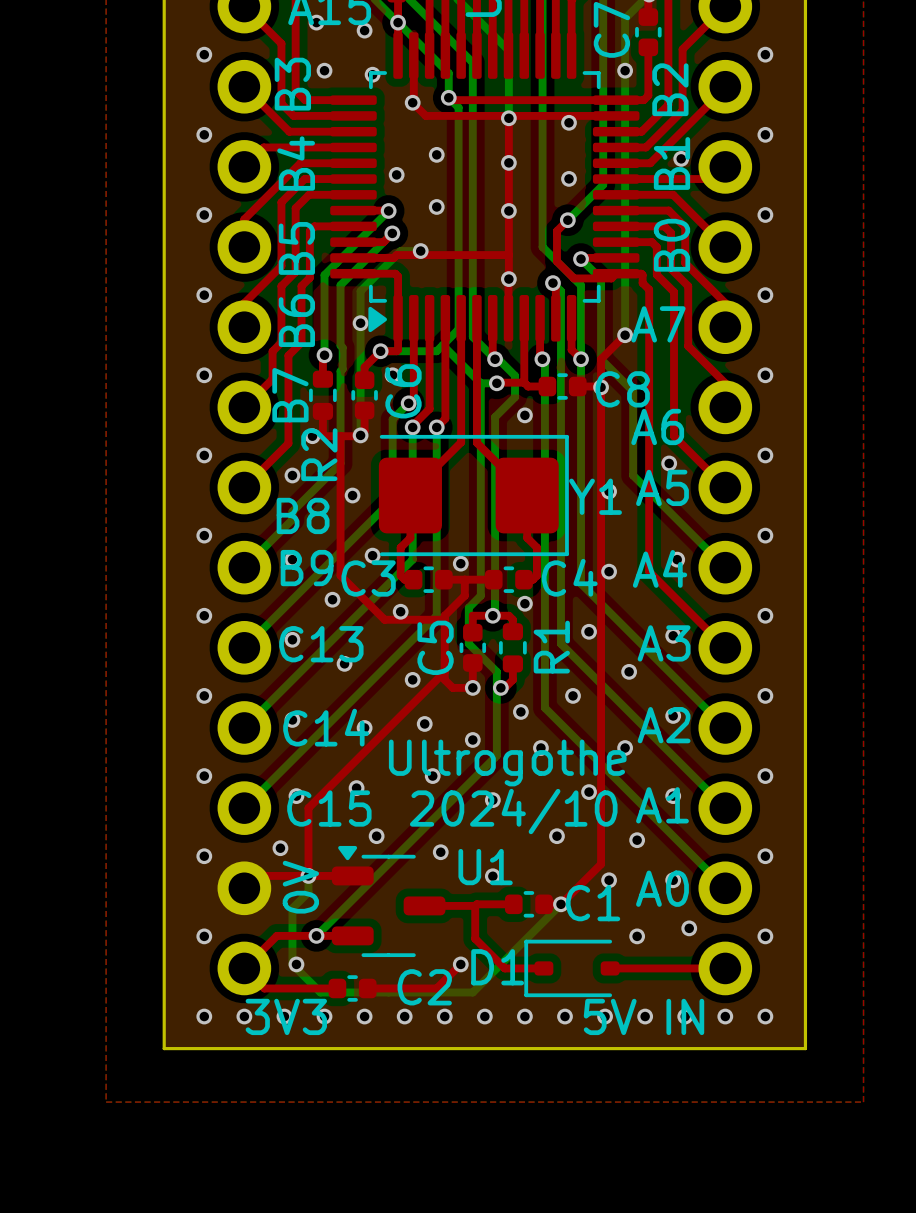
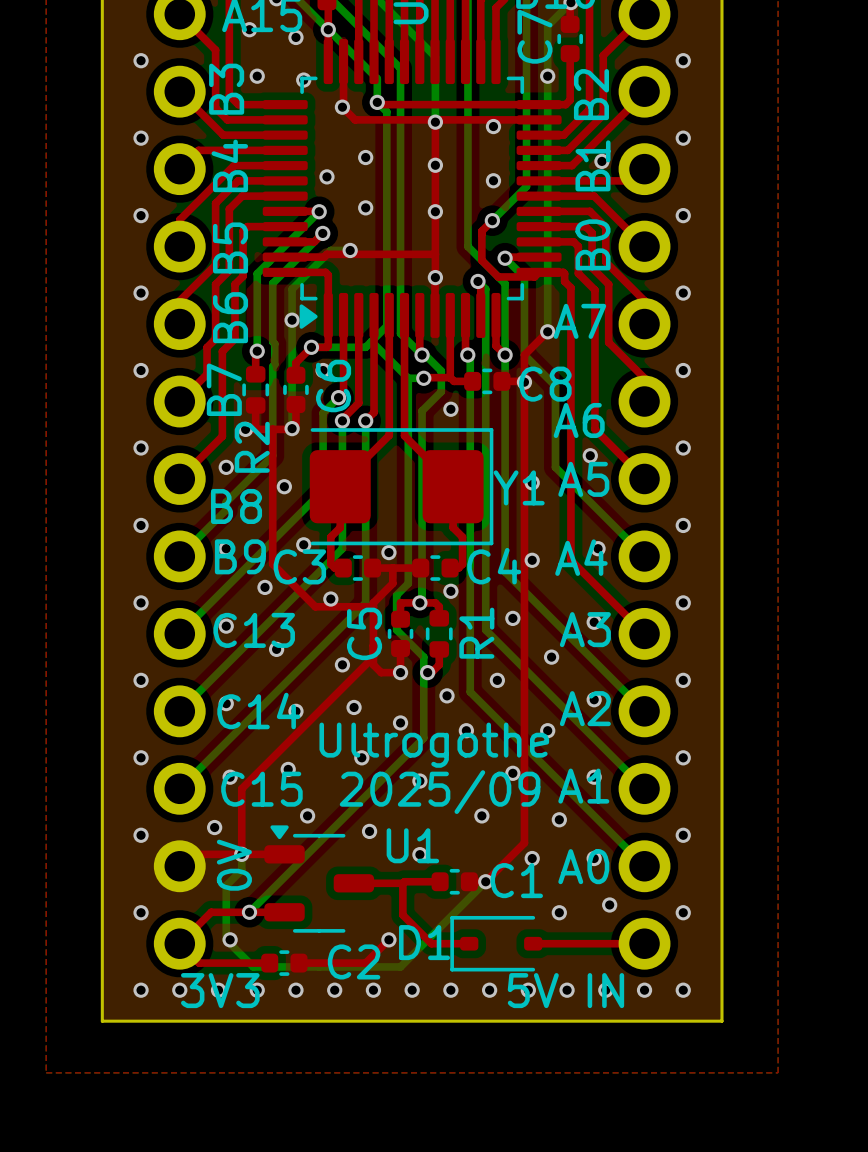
text: 2024/10 (513, 811) -> 2025/09 (440, 792)

